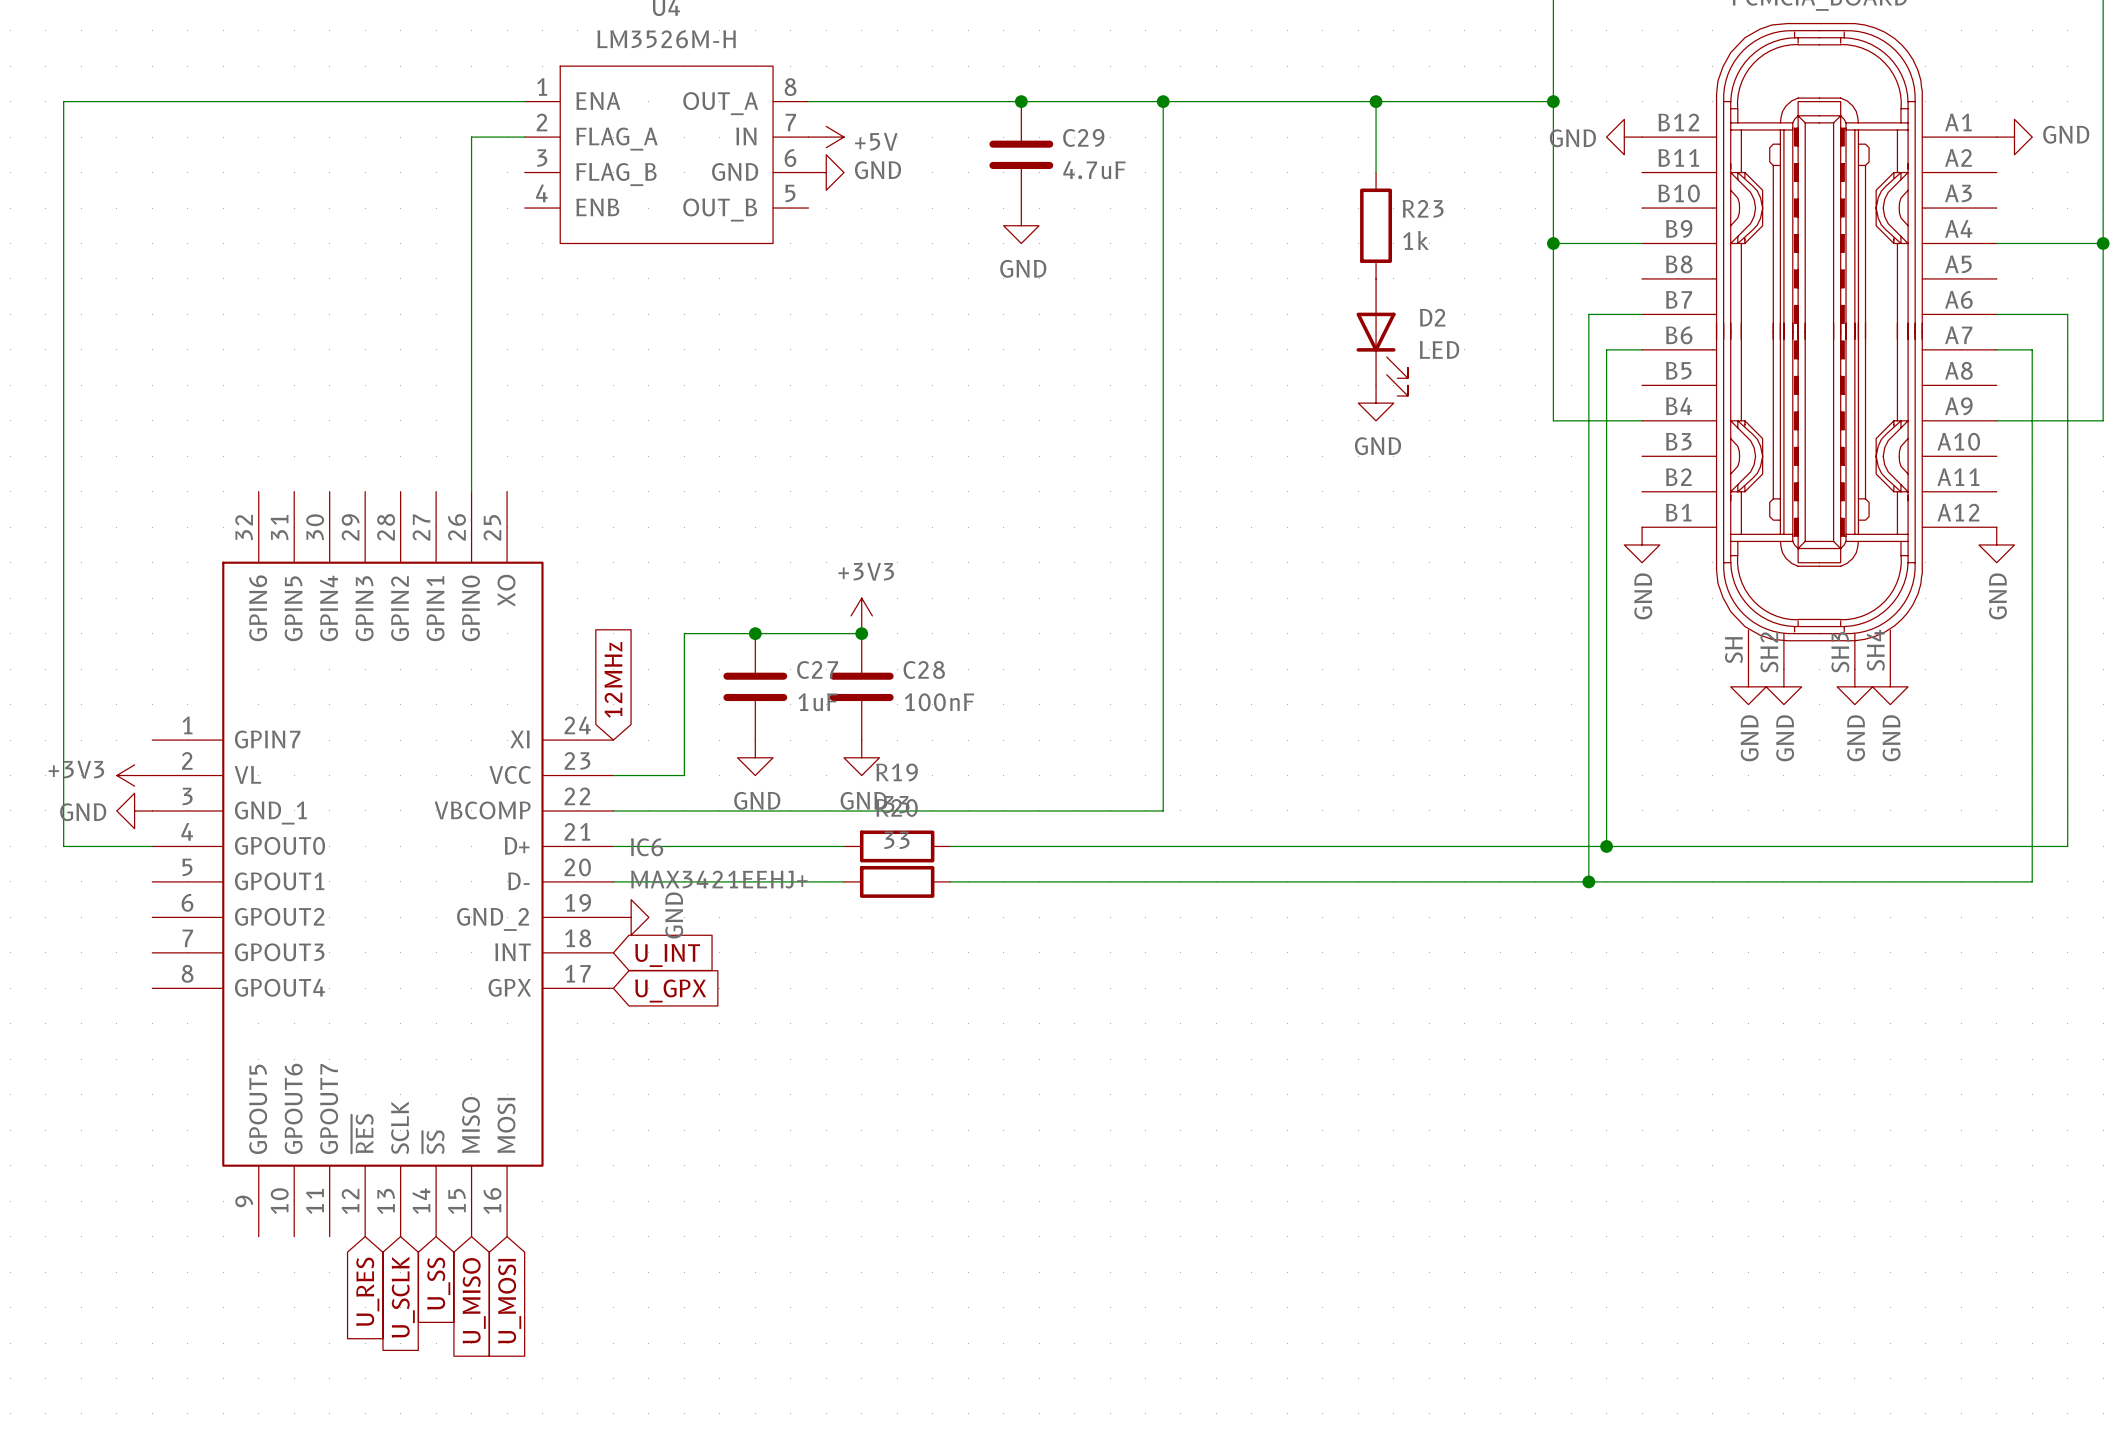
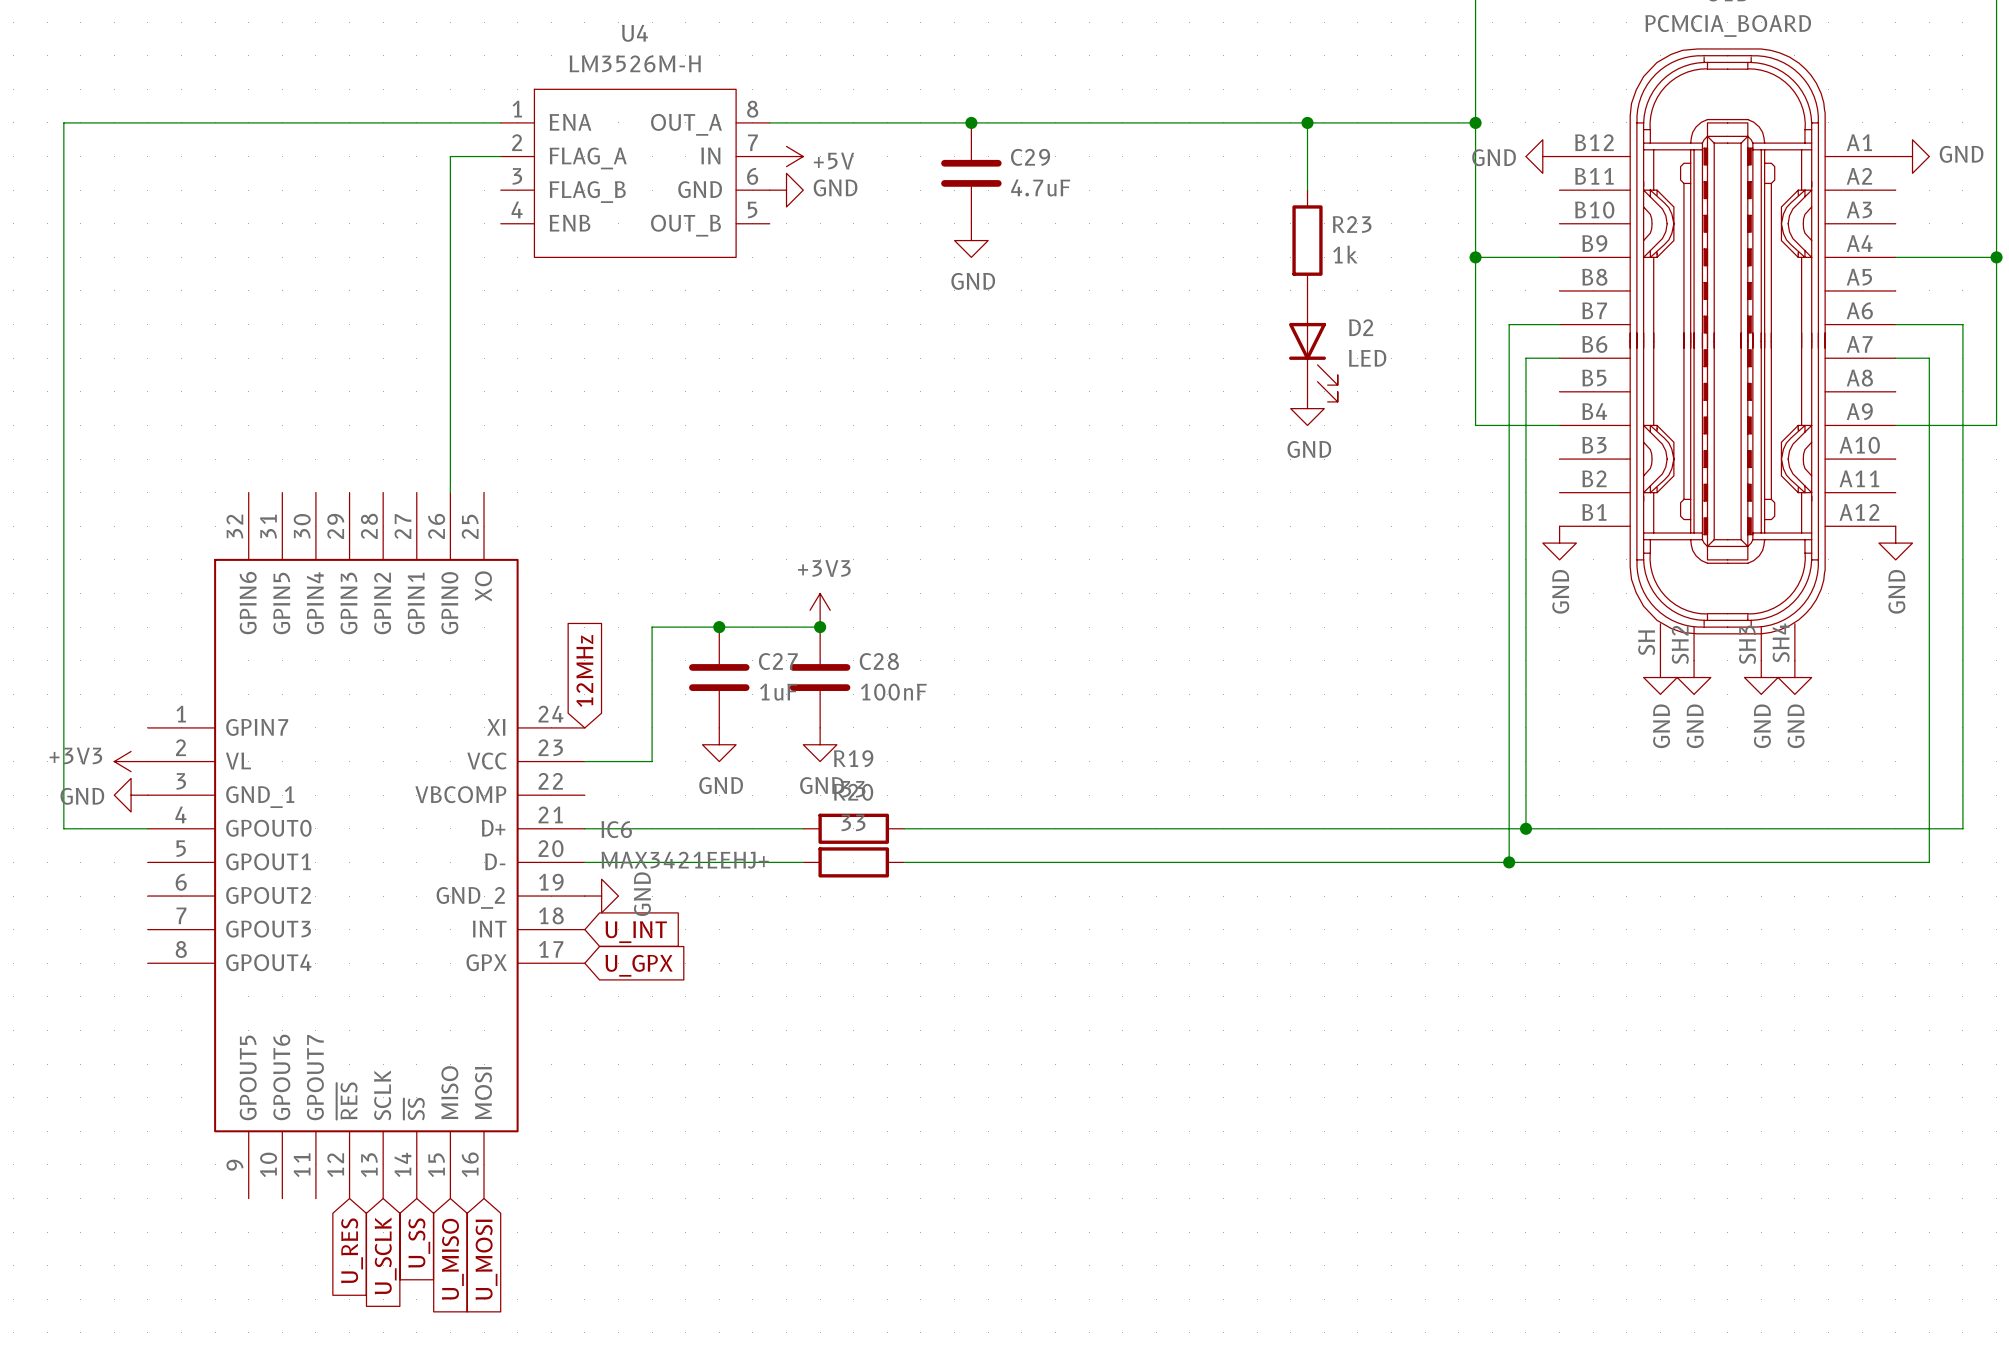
wire: (1163, 101) (1163, 810) (613, 810) -> none
junction: (1163, 101) -> none

